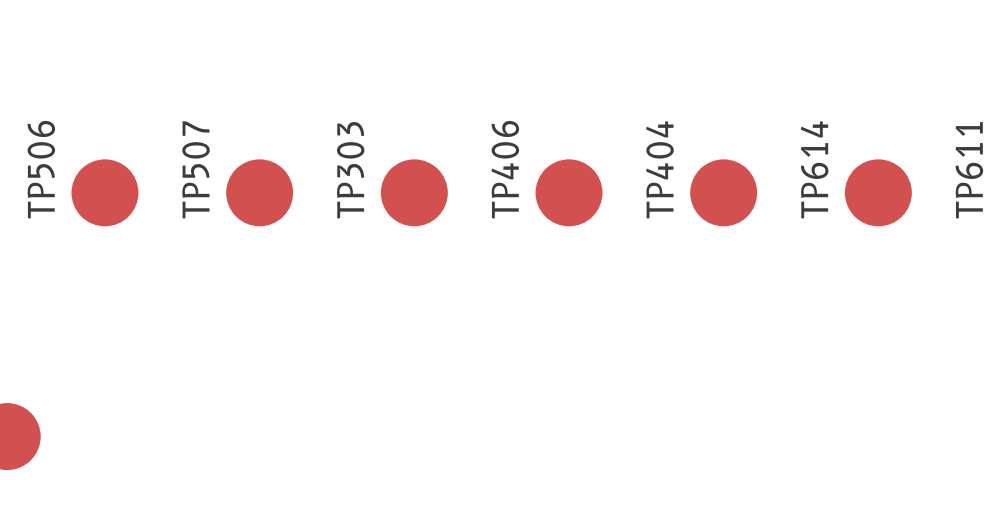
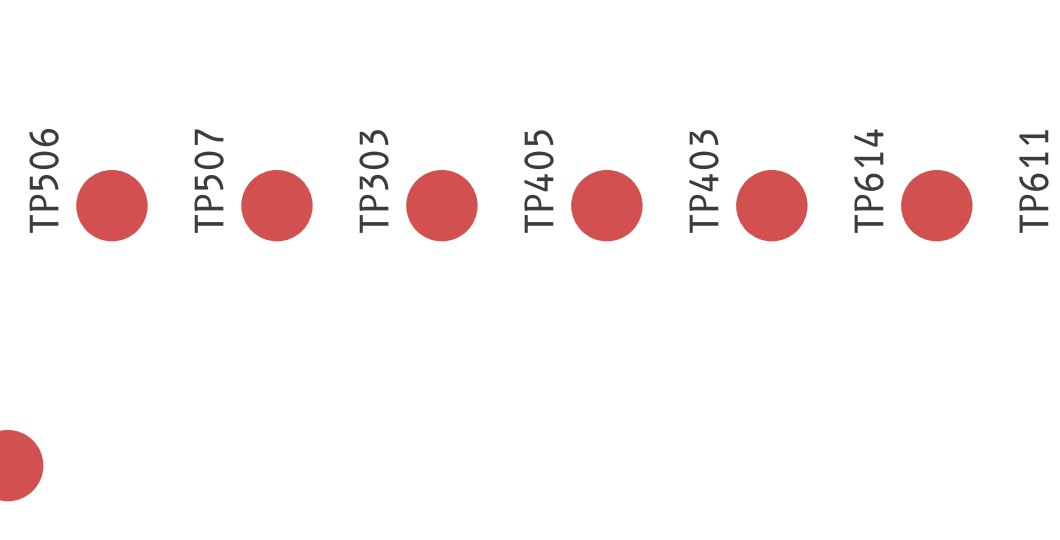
TP406 name: TP406 (505, 169) -> TP405 (538, 181)
TP404 name: TP404 (660, 169) -> TP403 (703, 181)

